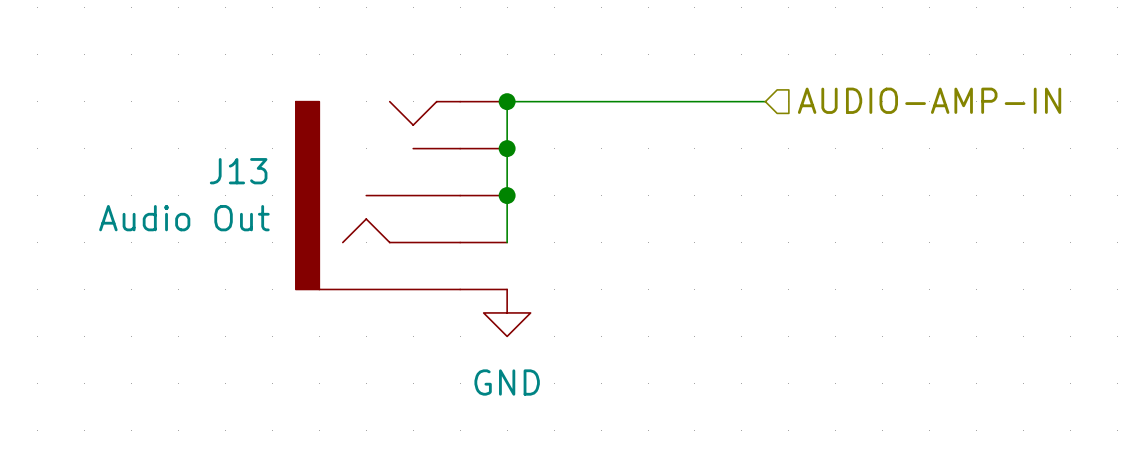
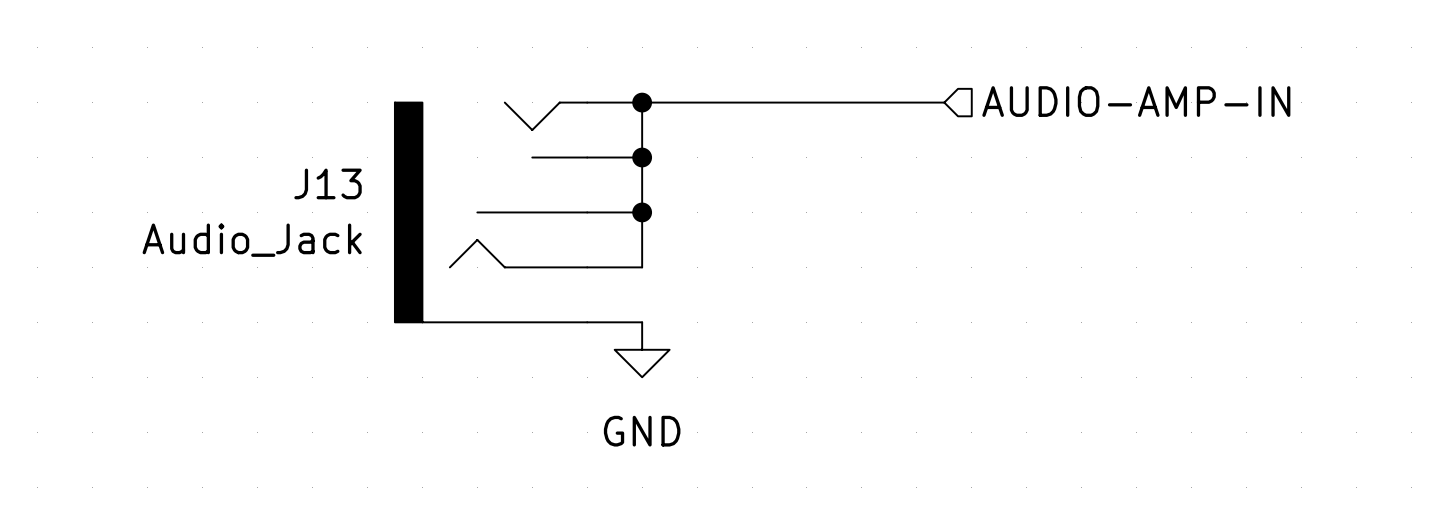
J13 value: Audio Out (184, 218) -> Audio_Jack (252, 240)

